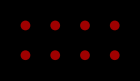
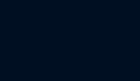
part: (25, 25) -> none
part: (55, 25) -> none
part: (84, 25) -> none
part: (114, 25) -> none
part: (25, 55) -> none
part: (55, 55) -> none
part: (84, 55) -> none
part: (114, 55) -> none

